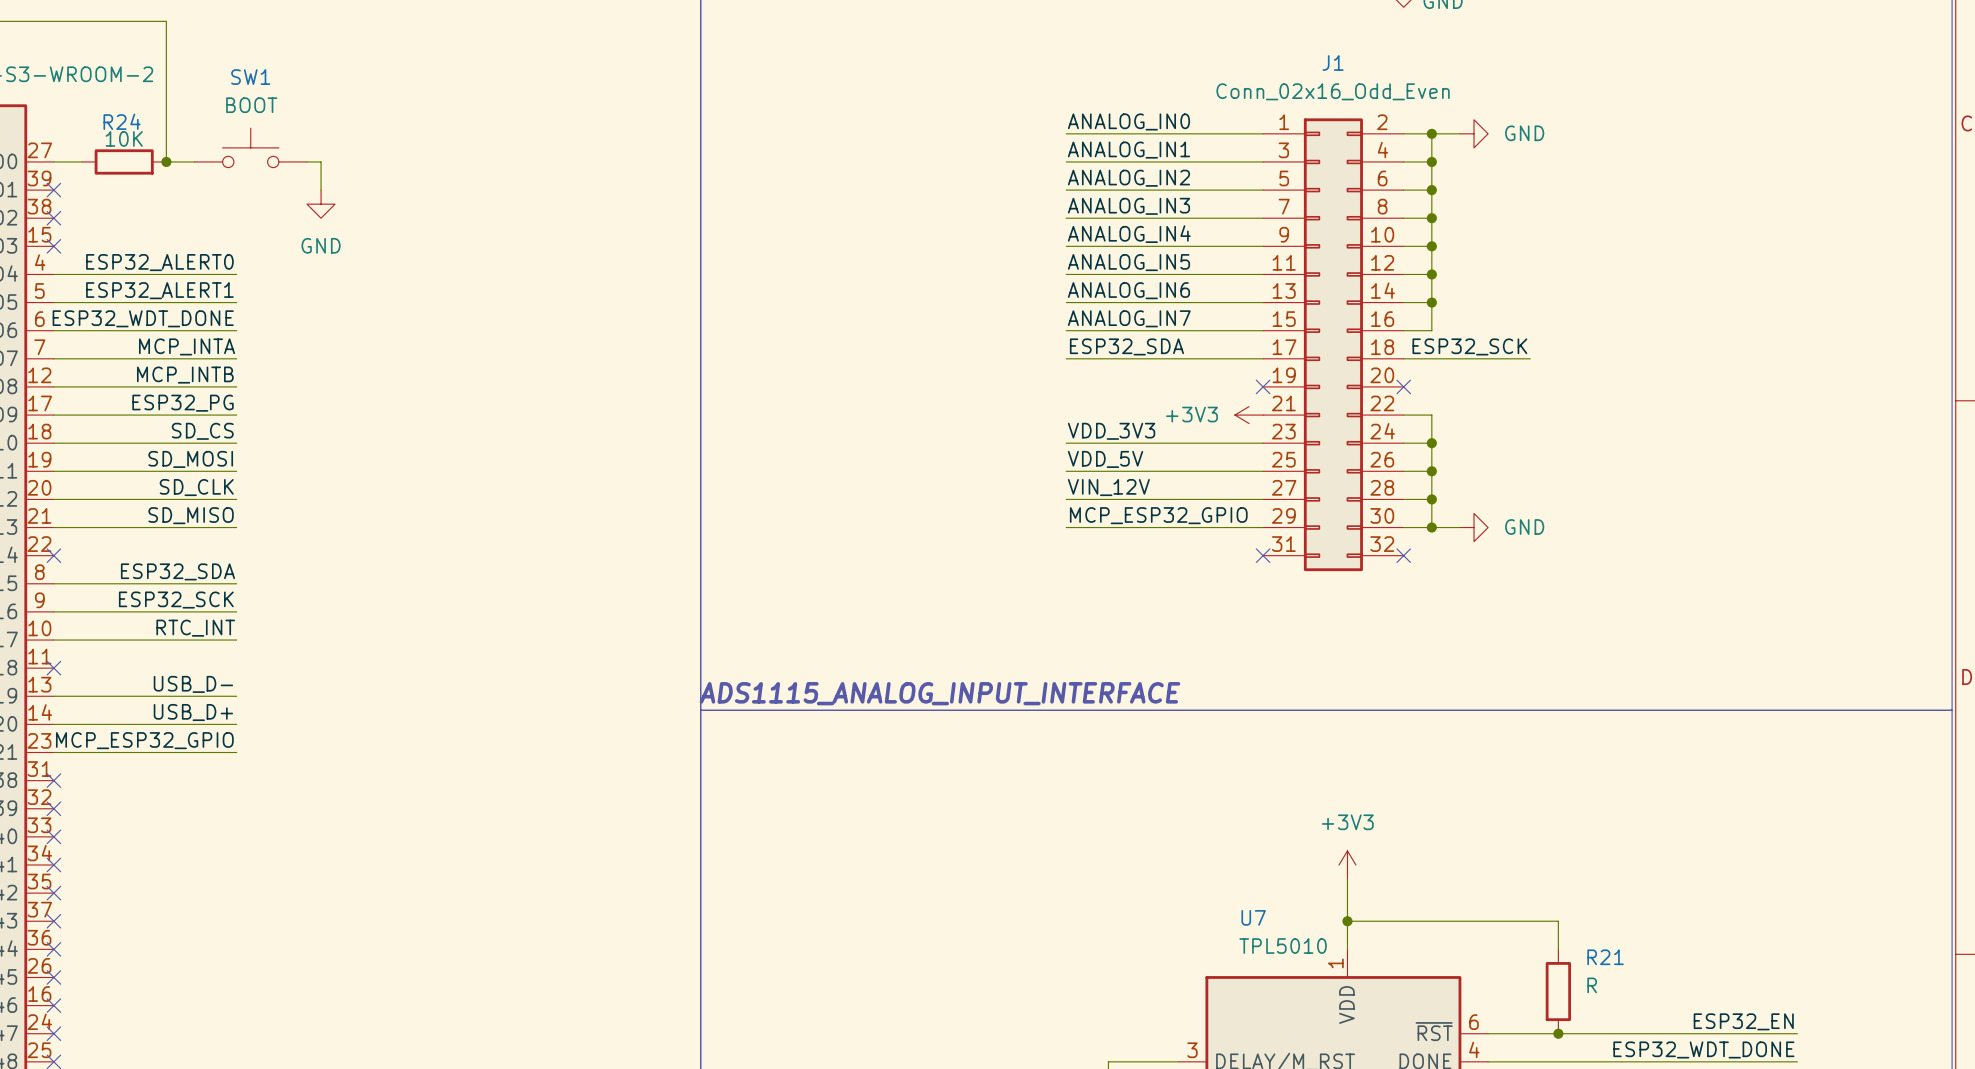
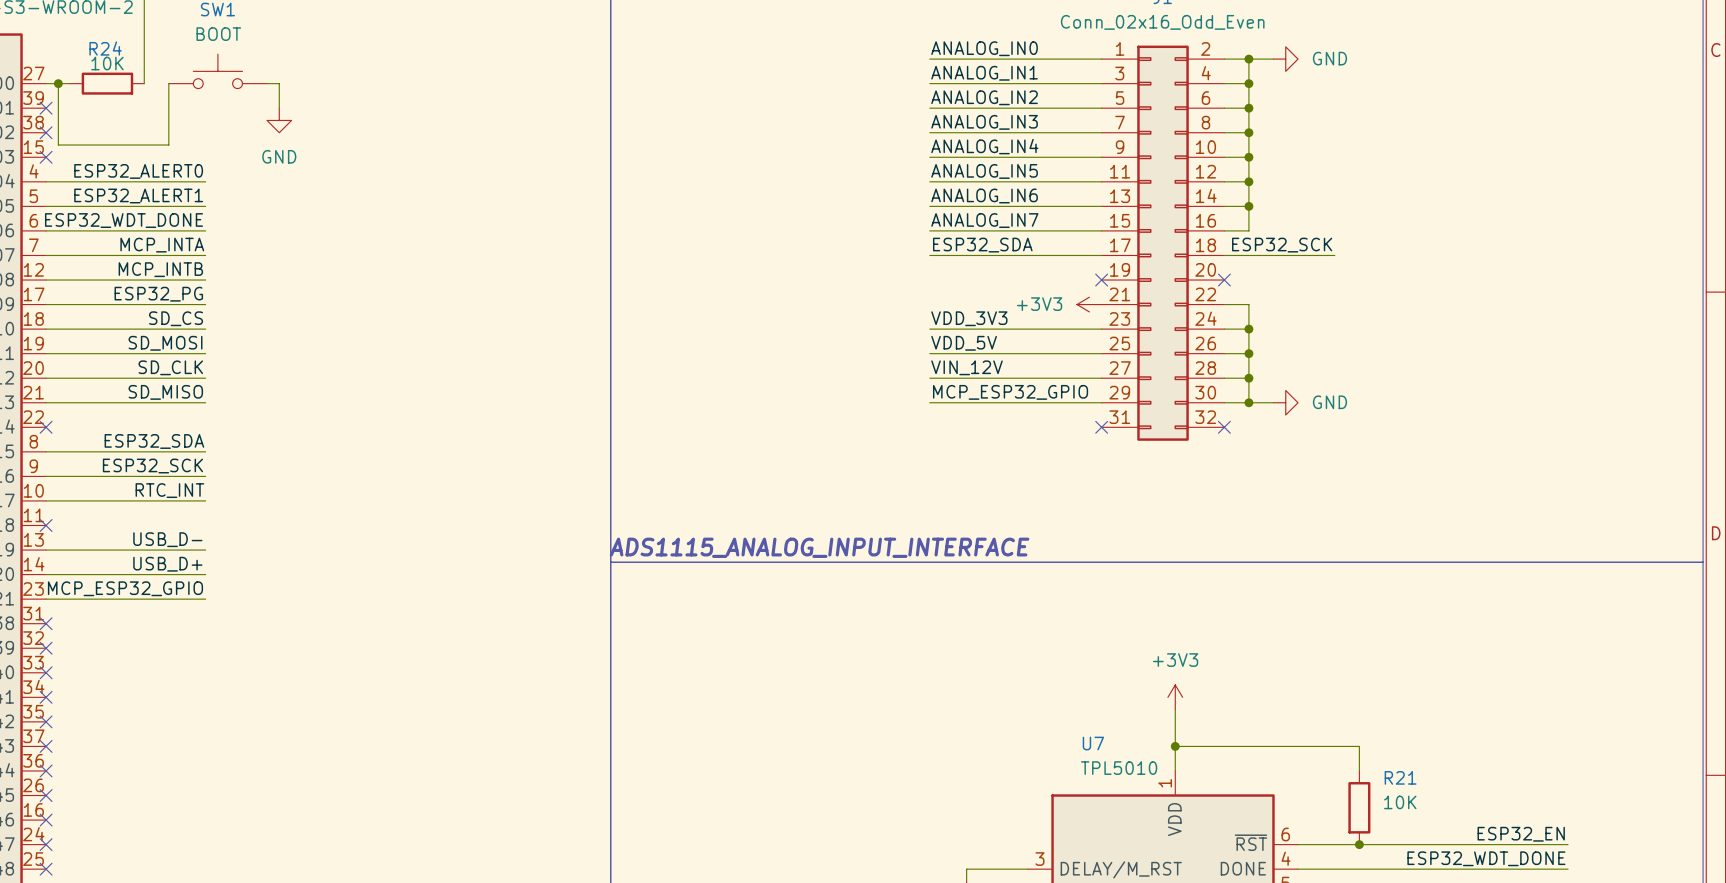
junction: none -> (58, 83)
wire: (166, 161) (194, 161) -> (58, 83) (58, 145) (168, 145) (168, 83)
junction: (166, 161) -> none
R21 value: R (1592, 985) -> 10K (1400, 802)

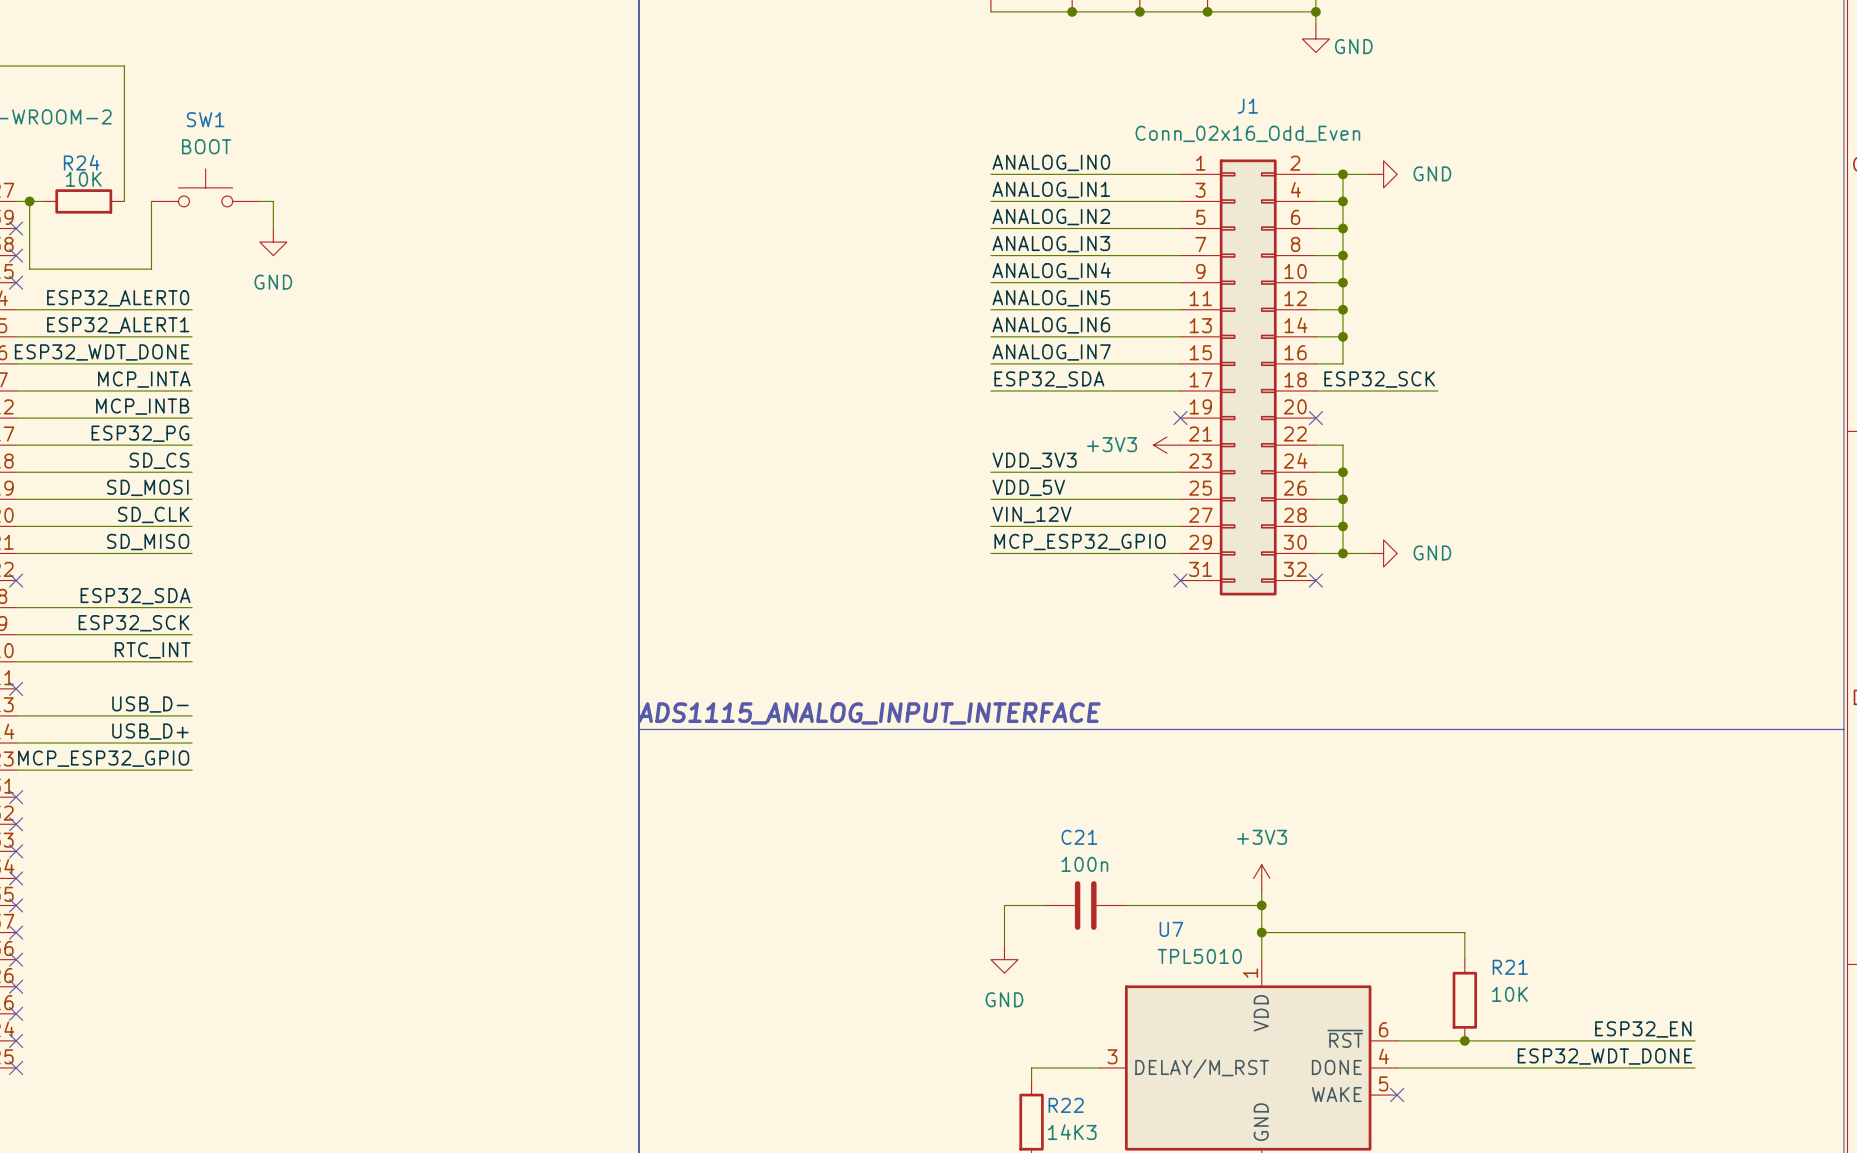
wire: none -> (1045, 905) (1004, 905) (1004, 946)
C21: none -> 100n (1085, 905)
wire: none -> (1126, 905) (1261, 905)
junction: none -> (1261, 905)
power symbol: none -> GND (1004, 959)

